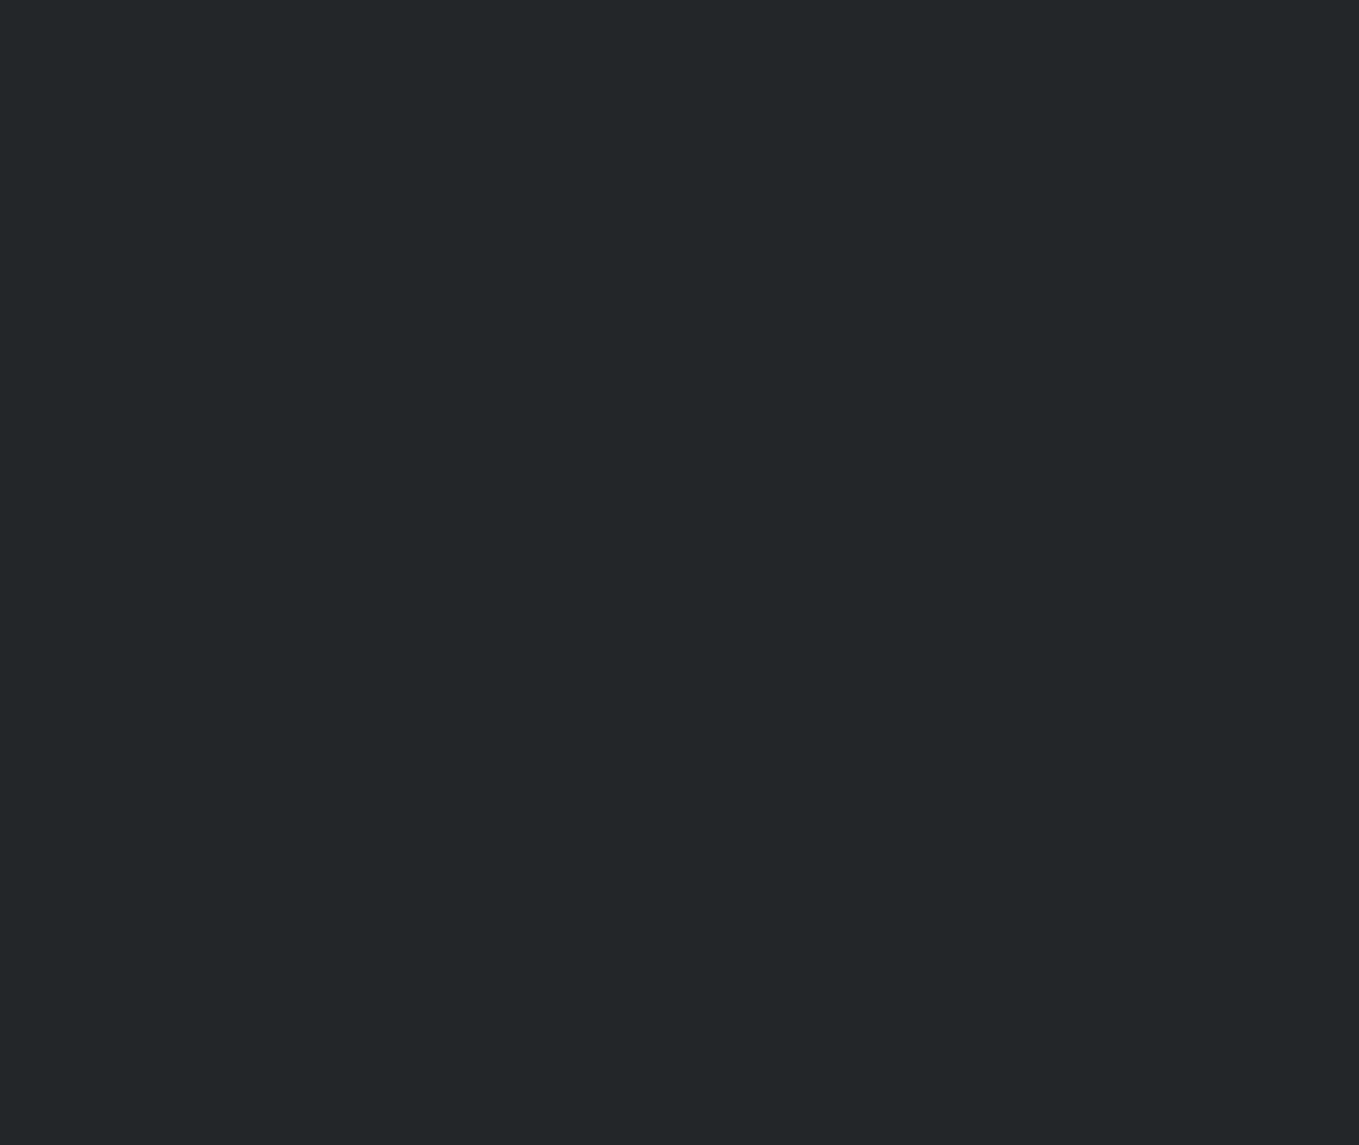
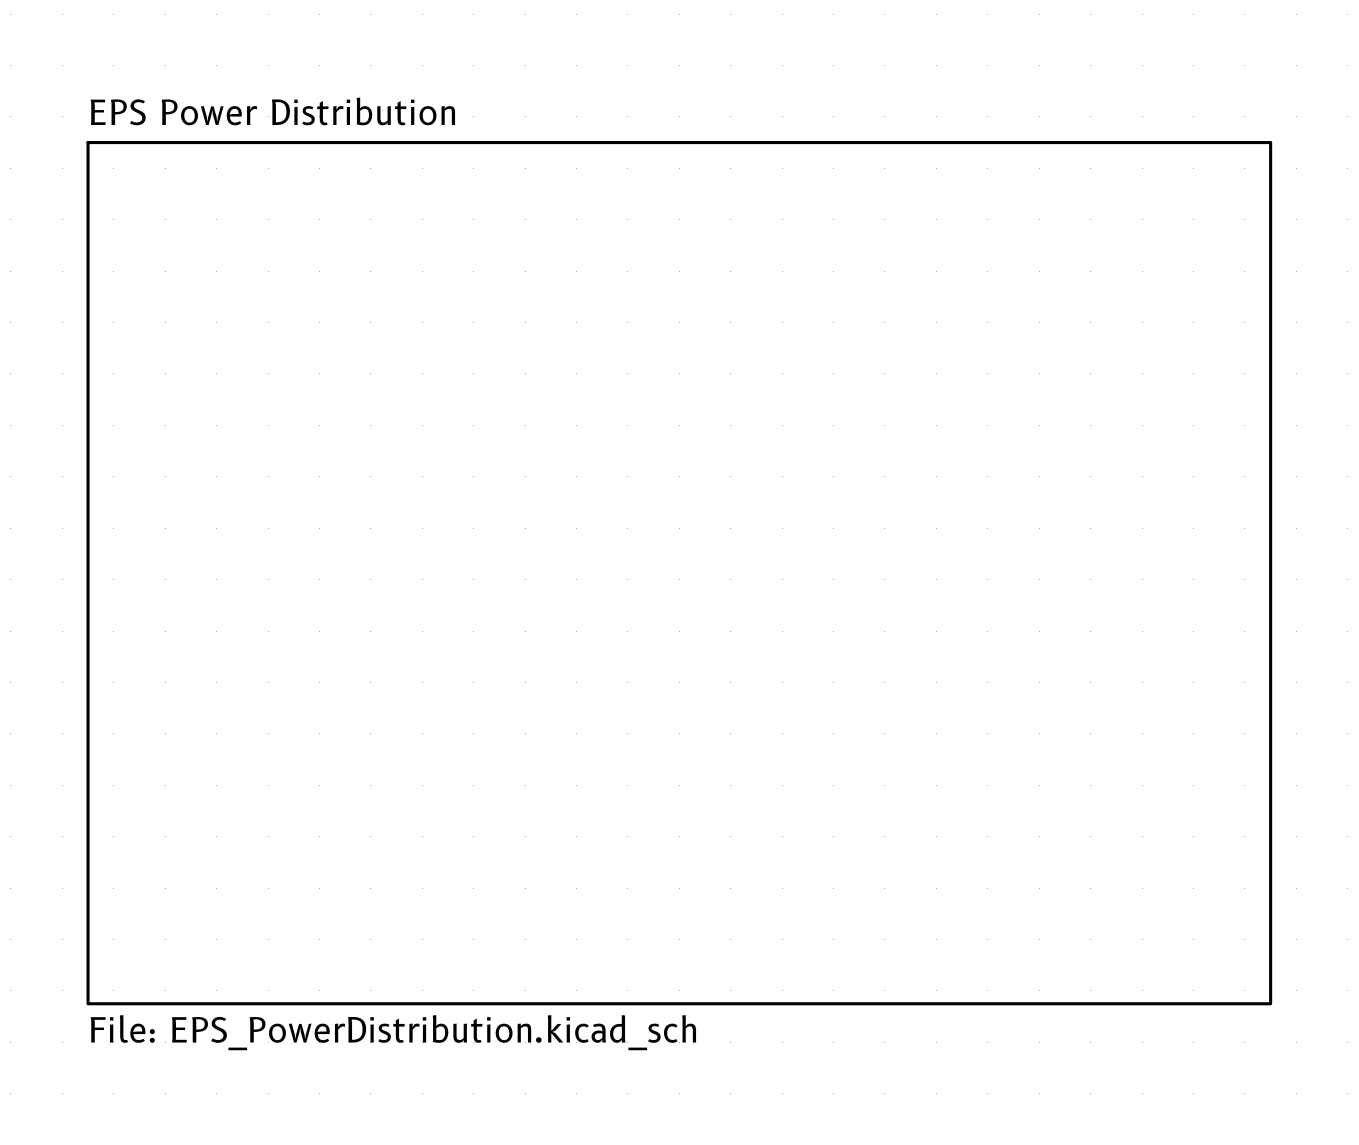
sheet EPS Power Distribution: none -> File: EPS_PowerDistribution.kicad_sch (679, 573)

